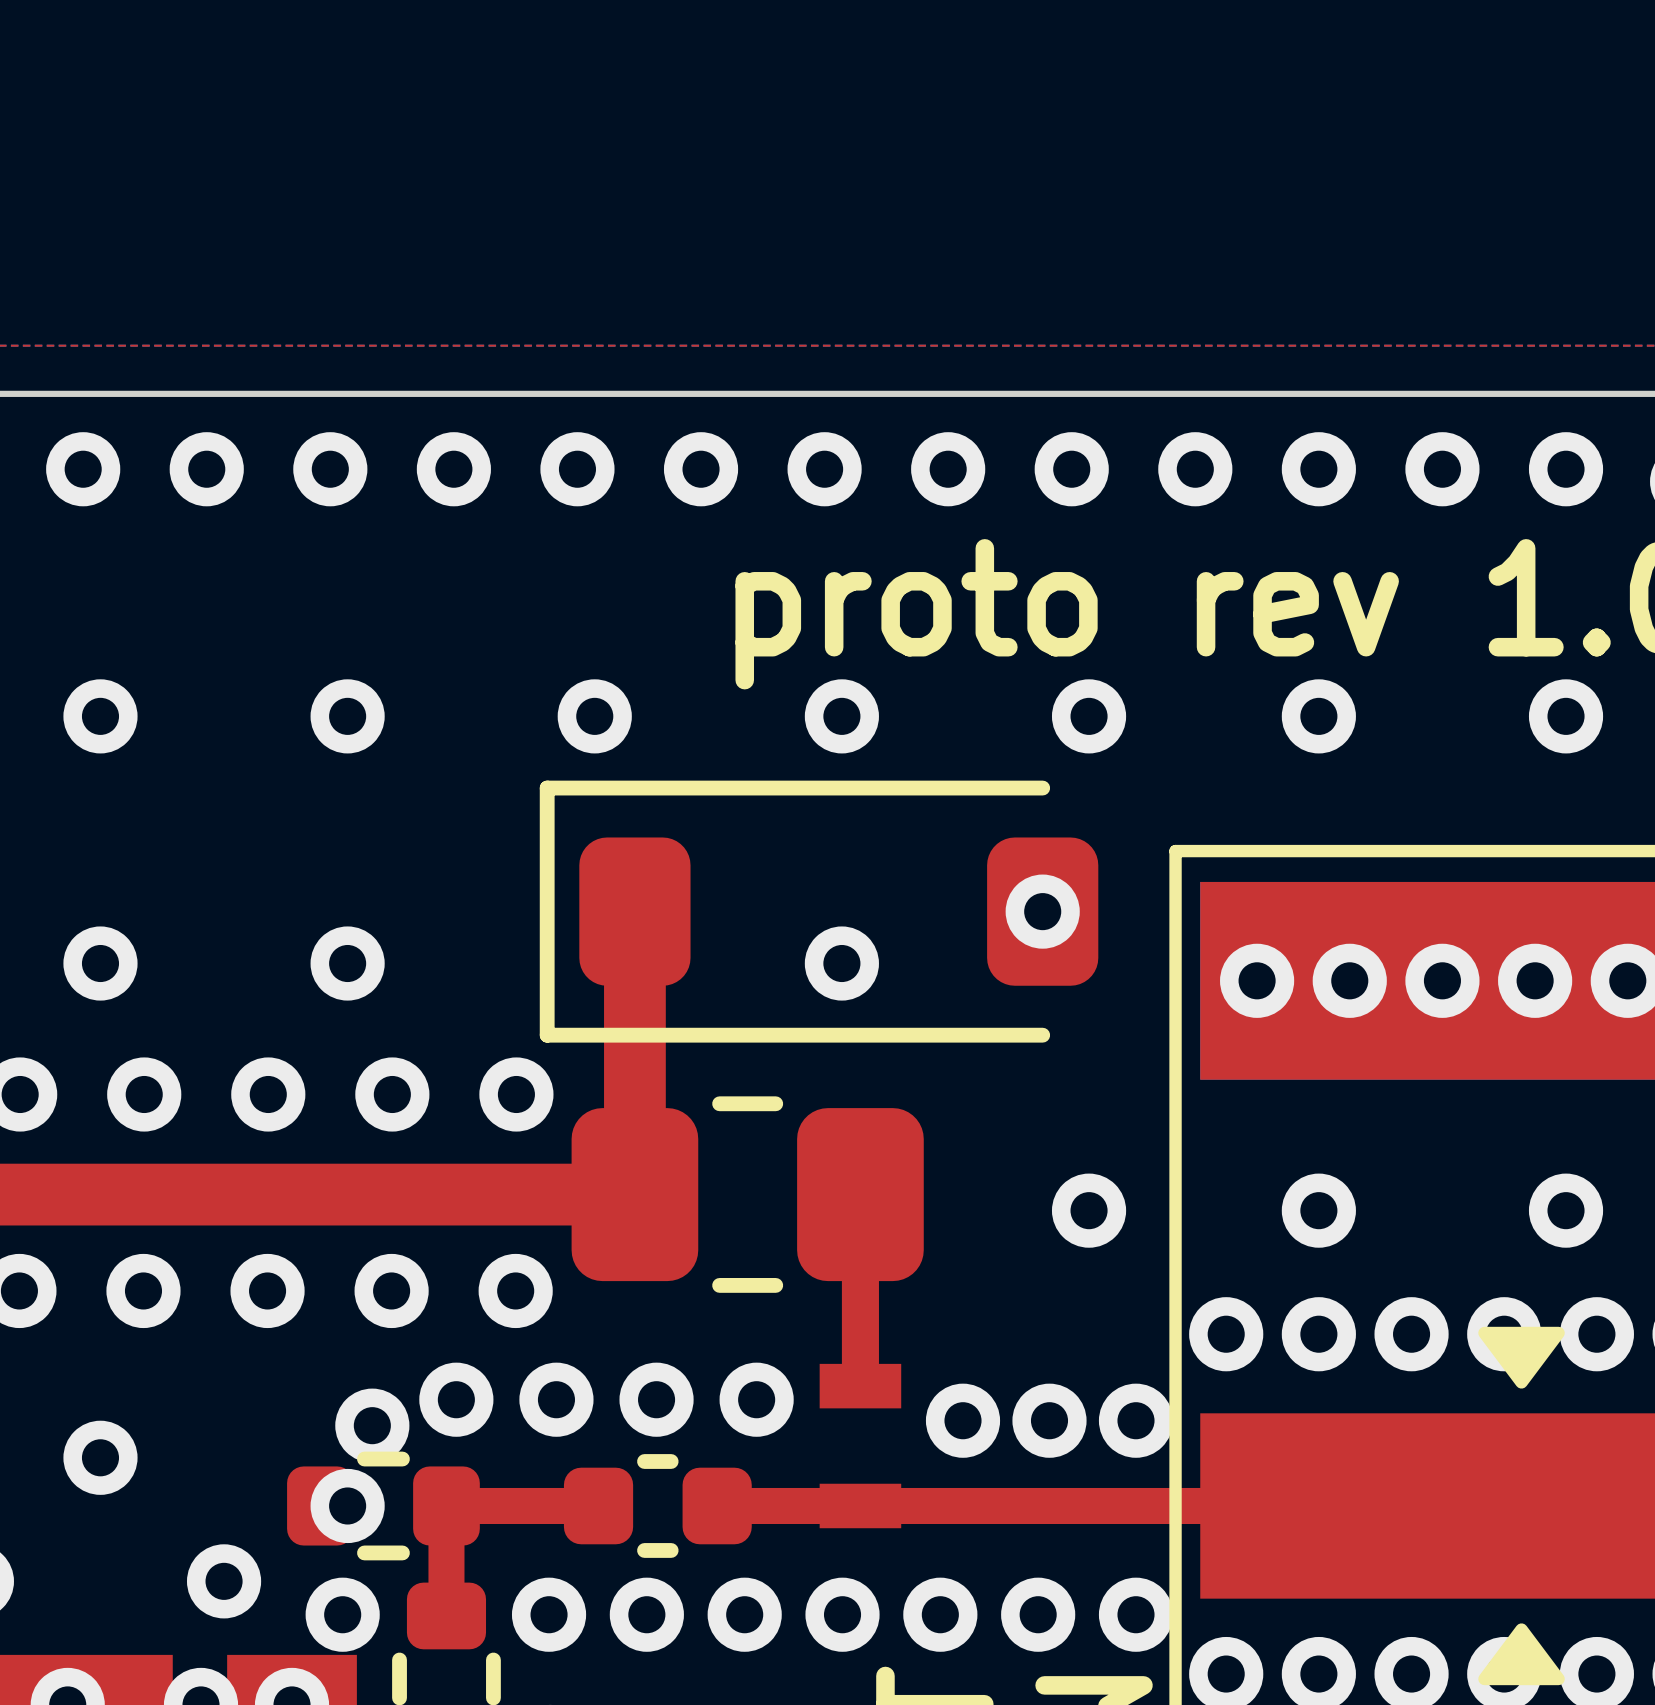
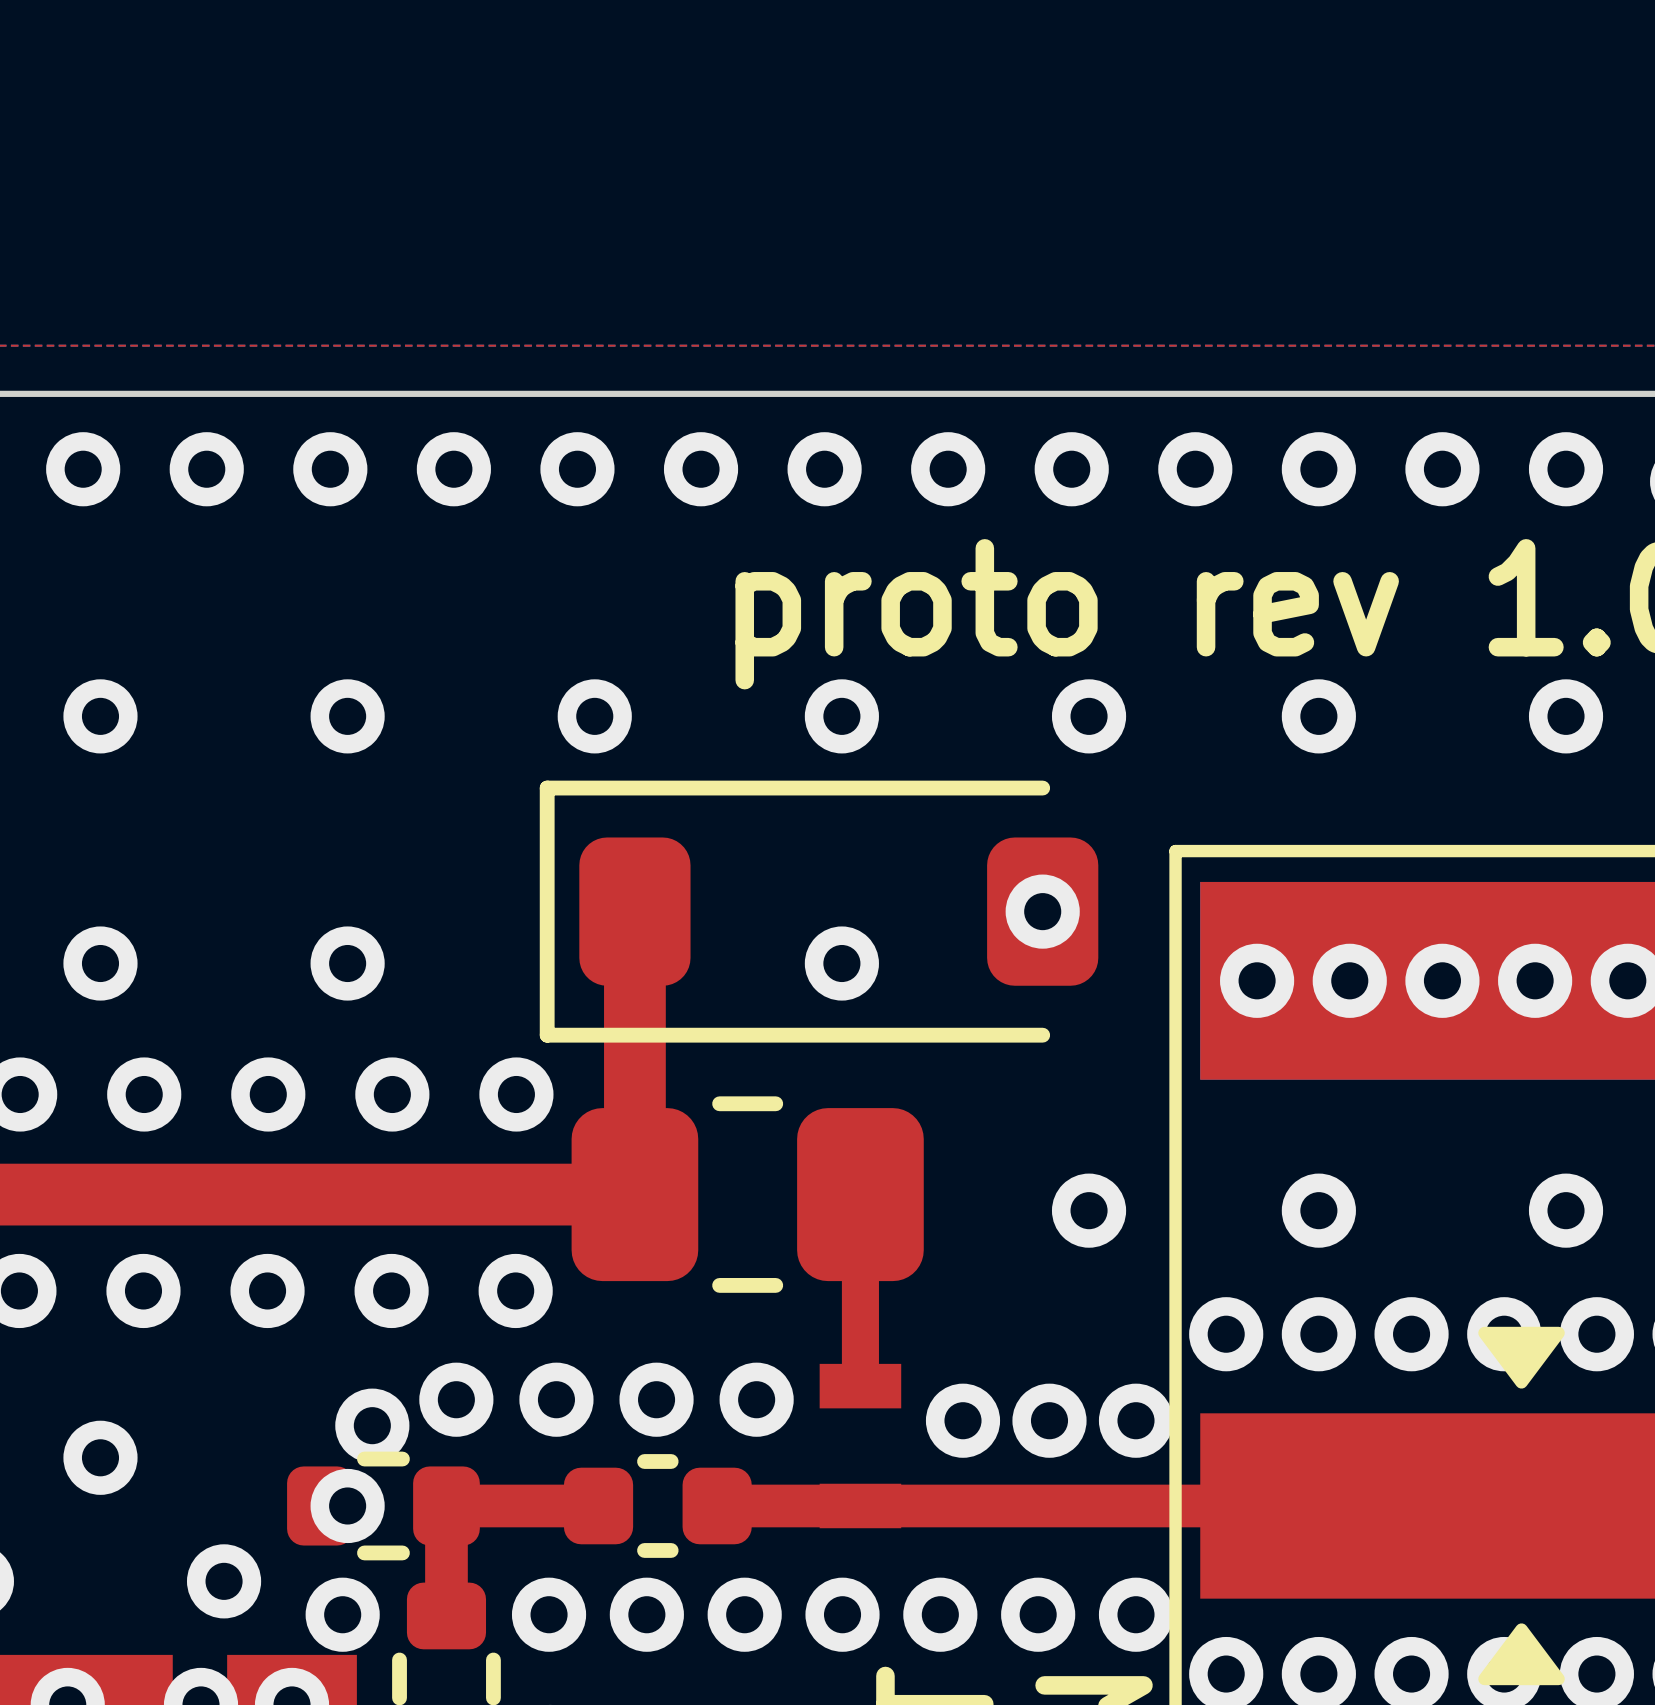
top track width: thin (598, 1505) (446, 1505) (446, 1615) -> thick (598, 1505) (446, 1505) (446, 1615)
top track width: thin (717, 1505) (1538, 1505) -> thick (717, 1505) (1538, 1505)

